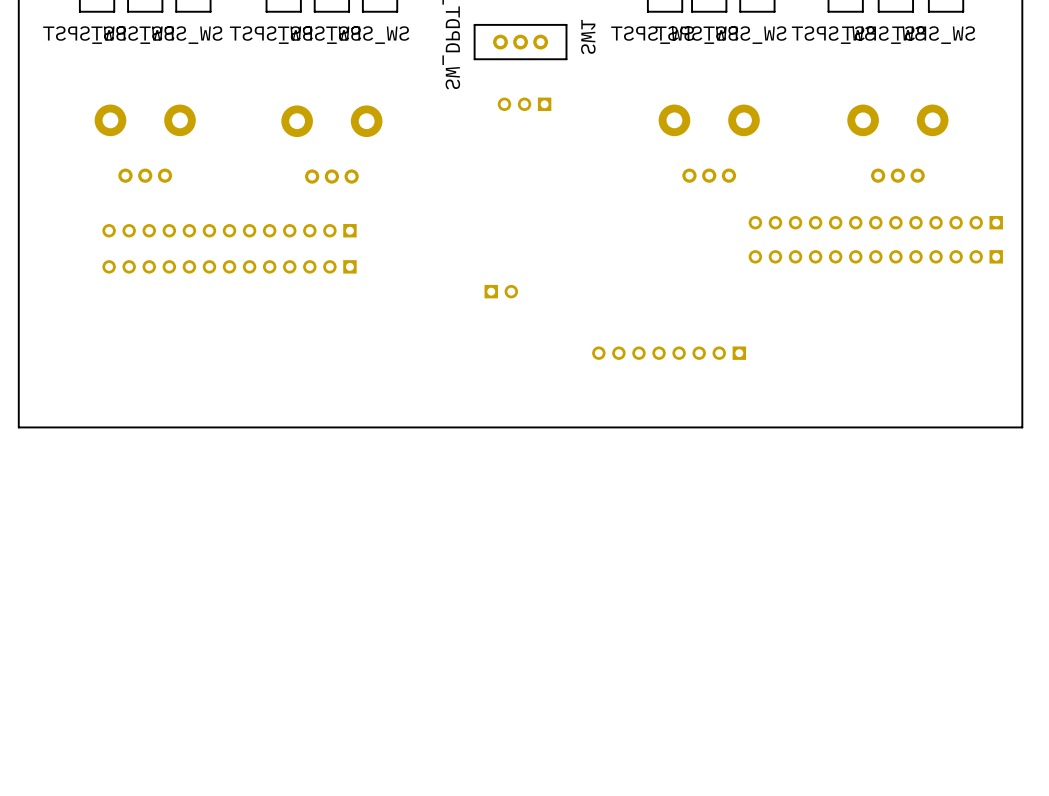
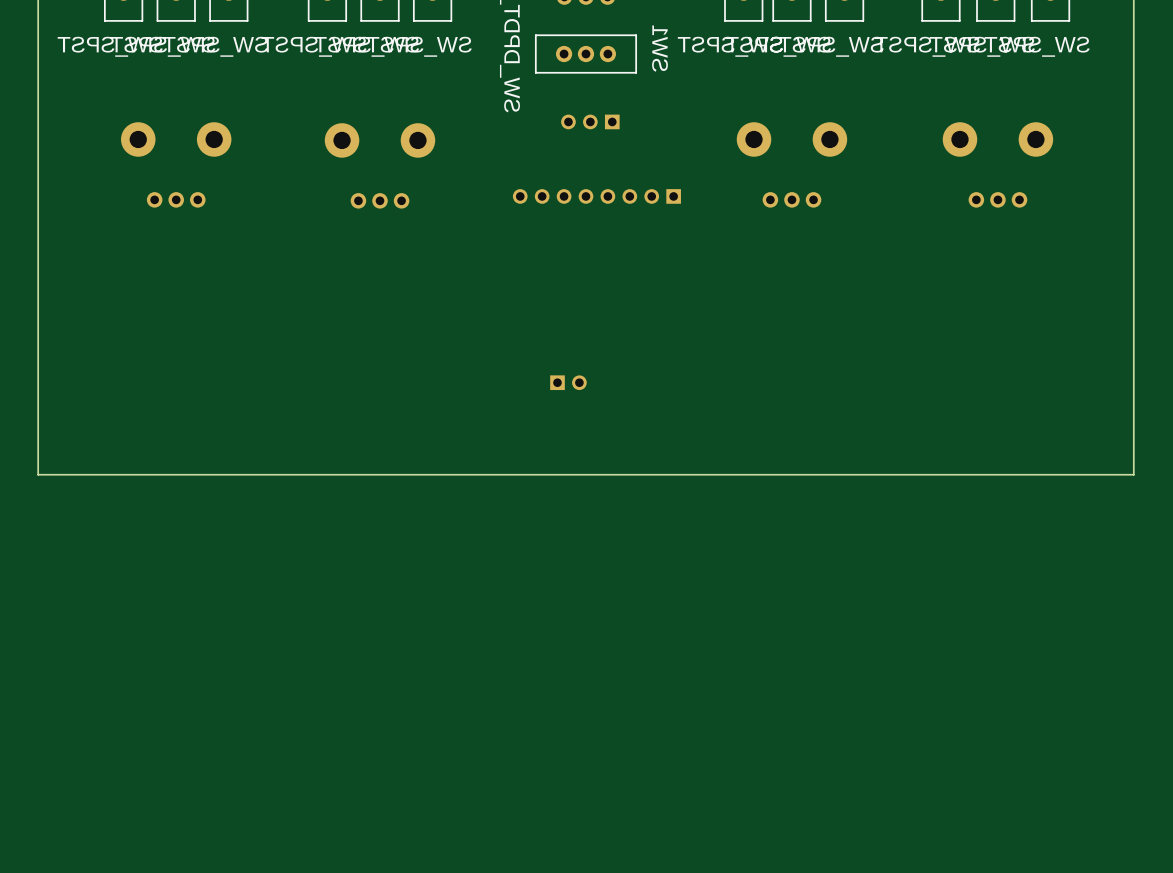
part: none -> (596, 196)
part: (875, 222) -> none
part: (229, 230) -> none
part: (875, 256) -> none
part: (229, 266) -> none
part position: (501, 291) -> (568, 382)
part: (669, 353) -> none

